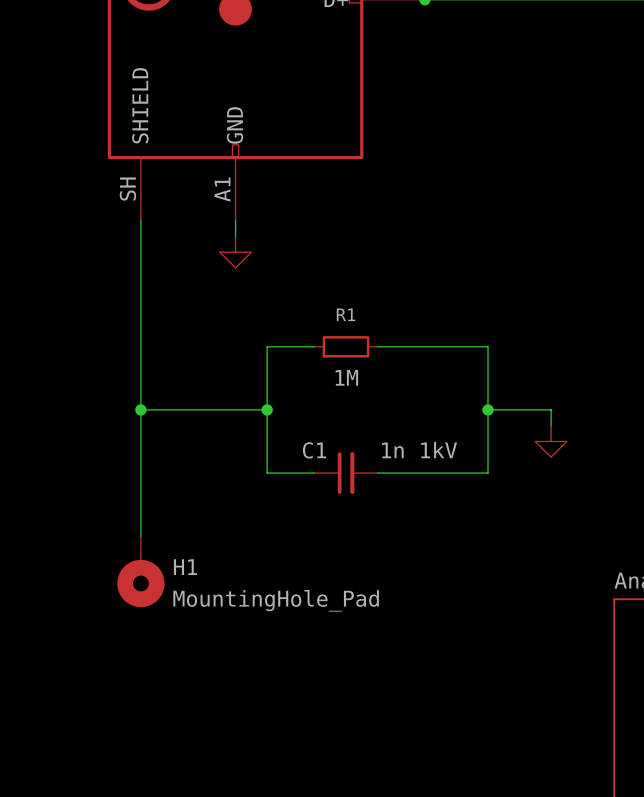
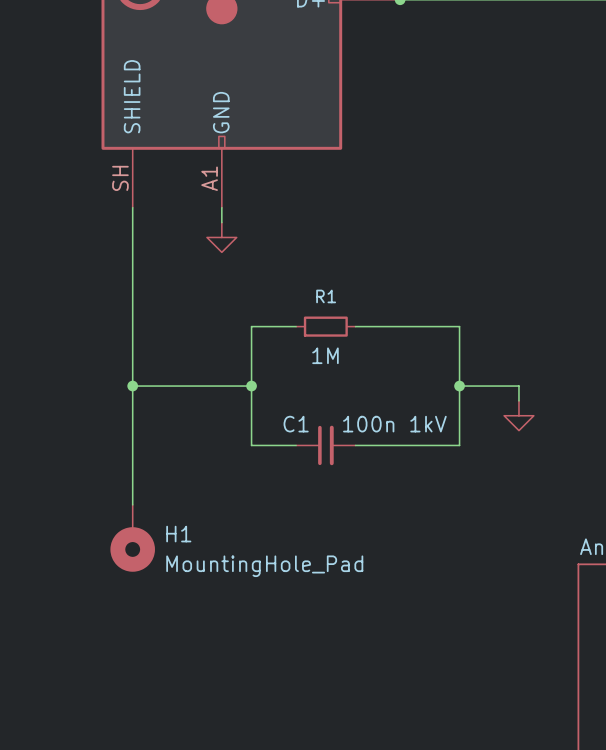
C1 value: 1n 1kV (419, 450) -> 100n 1kV (394, 424)

